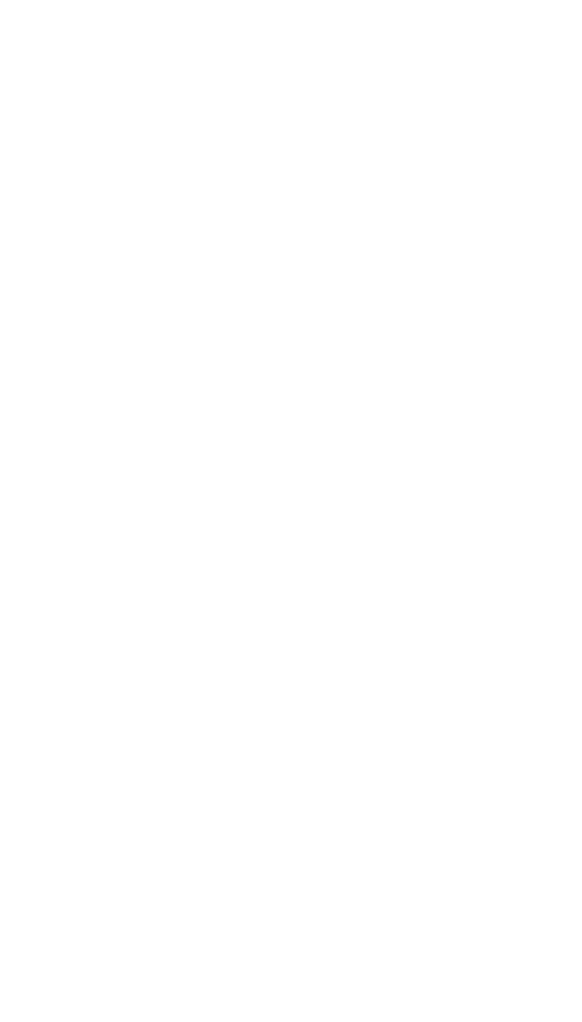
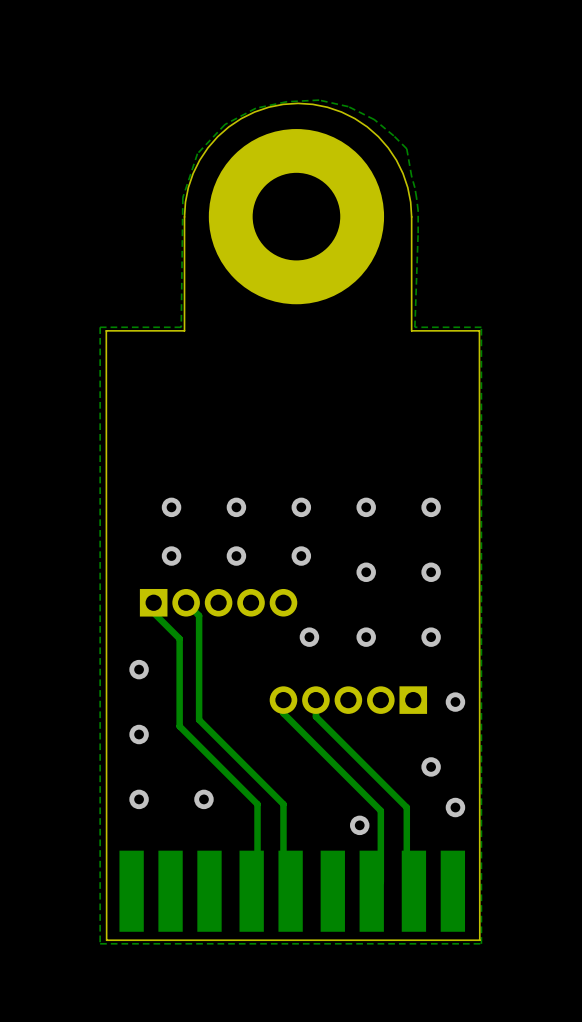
zone outline: none -> (319, 100) (348, 106) (374, 119) (406, 148) (418, 210) (414, 327) (481, 327) (481, 943) (100, 943) (100, 327) (181, 327) (182, 197) (197, 153) (225, 124) (255, 108) (286, 101) (319, 100)
part: none -> (296, 216)
board edge: none -> (411, 216) (411, 330) (479, 330) (479, 940) (106, 940) (106, 330) (184, 330) (184, 216) (188, 187) (199, 160) (217, 136) (228, 126) (254, 112) (283, 104) (312, 104) (341, 112) (367, 126) (388, 147) (403, 173) (410, 202) (411, 216)
via: none -> (171, 507)
via: none -> (236, 507)
via: none -> (301, 507)
via: none -> (366, 507)
via: none -> (431, 507)
via: none -> (171, 556)
via: none -> (236, 556)
via: none -> (301, 556)
via: none -> (366, 572)
via: none -> (431, 572)
track: none -> (153, 602) (153, 612) (179, 638) (179, 726) (257, 804) (257, 885) (251, 891)
track: none -> (186, 602) (199, 615) (199, 719) (283, 804) (283, 884) (290, 891)
part: none -> (218, 602)
via: none -> (309, 637)
via: none -> (366, 637)
via: none -> (431, 637)
via: none -> (139, 669)
track: none -> (283, 700) (283, 713) (380, 810) (380, 882) (371, 891)
track: none -> (315, 700) (315, 716) (406, 807) (406, 884) (413, 891)
part: none -> (348, 700)
via: none -> (455, 702)
via: none -> (139, 734)
via: none -> (431, 766)
via: none -> (139, 799)
via: none -> (203, 799)
via: none -> (455, 807)
via: none -> (359, 825)
part: none -> (292, 891)

